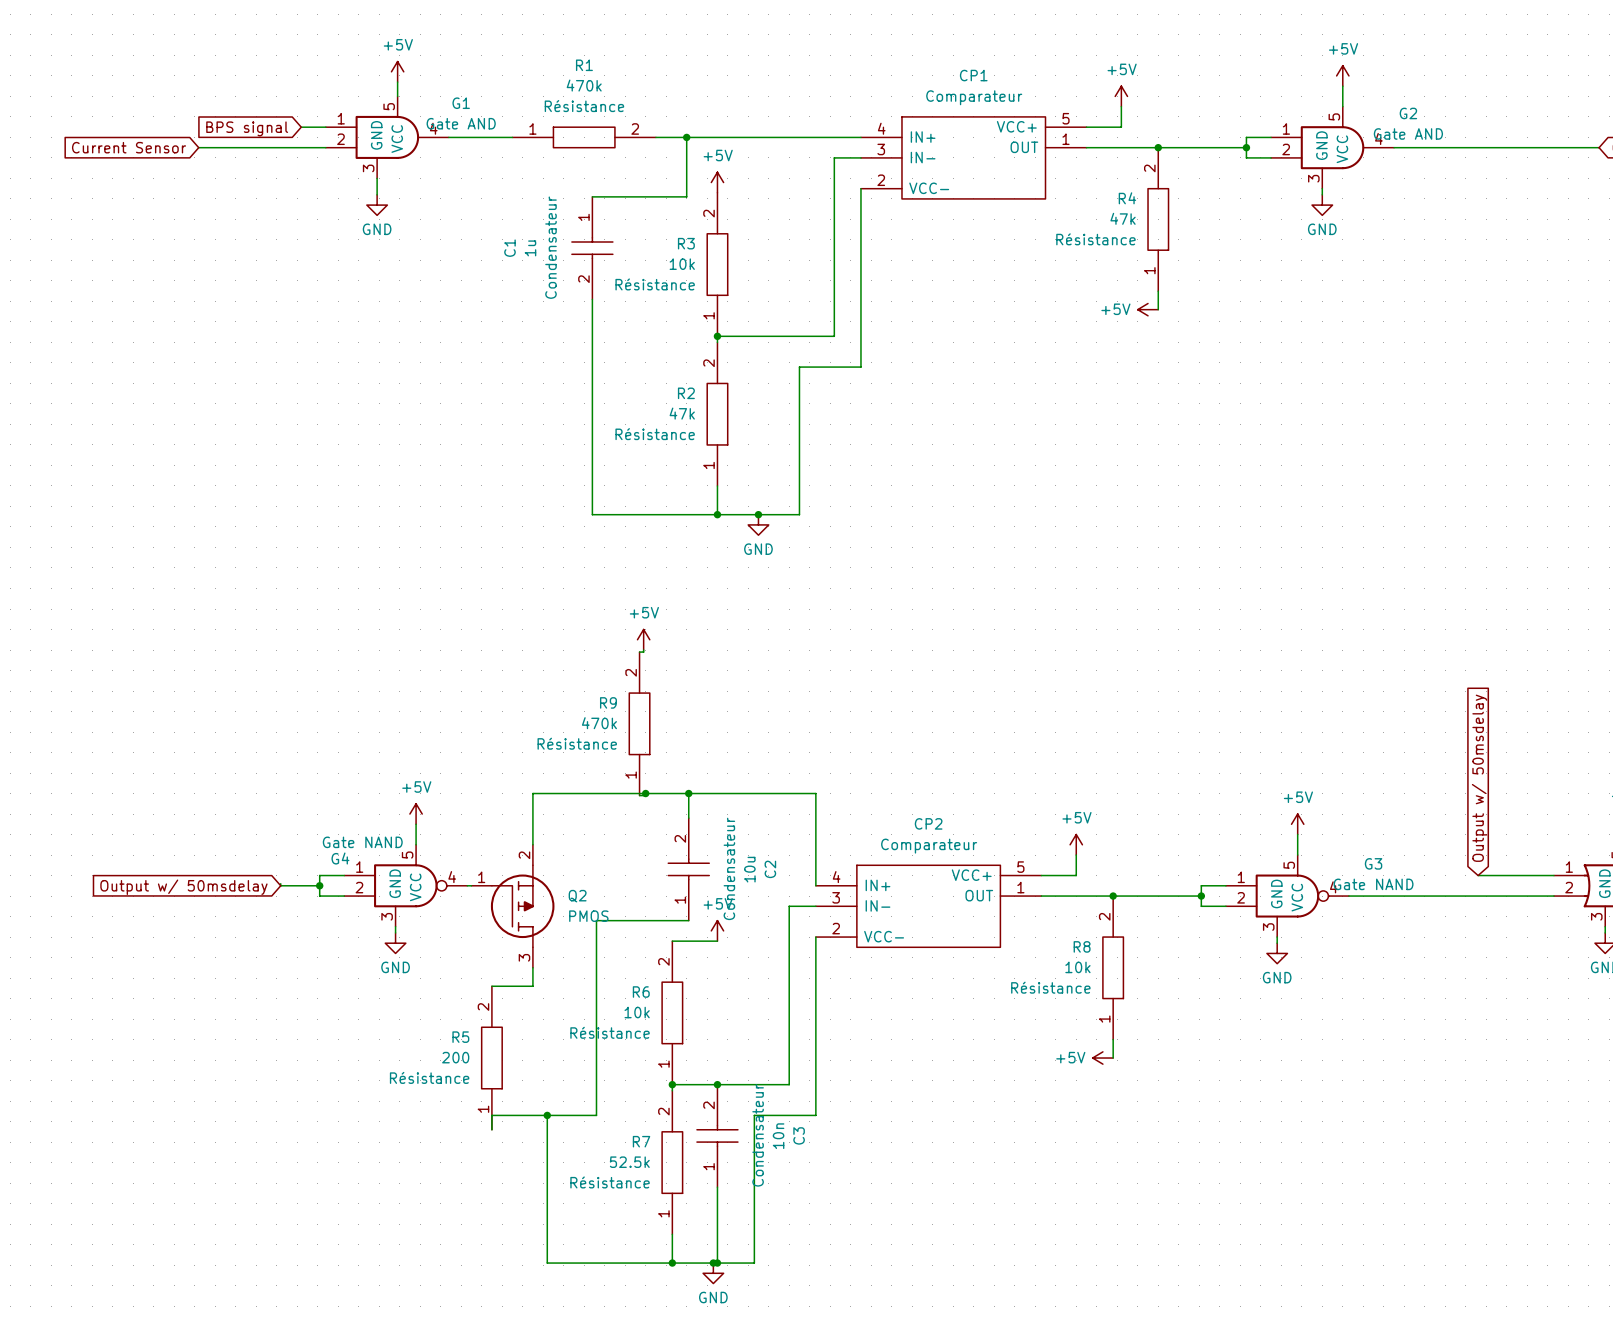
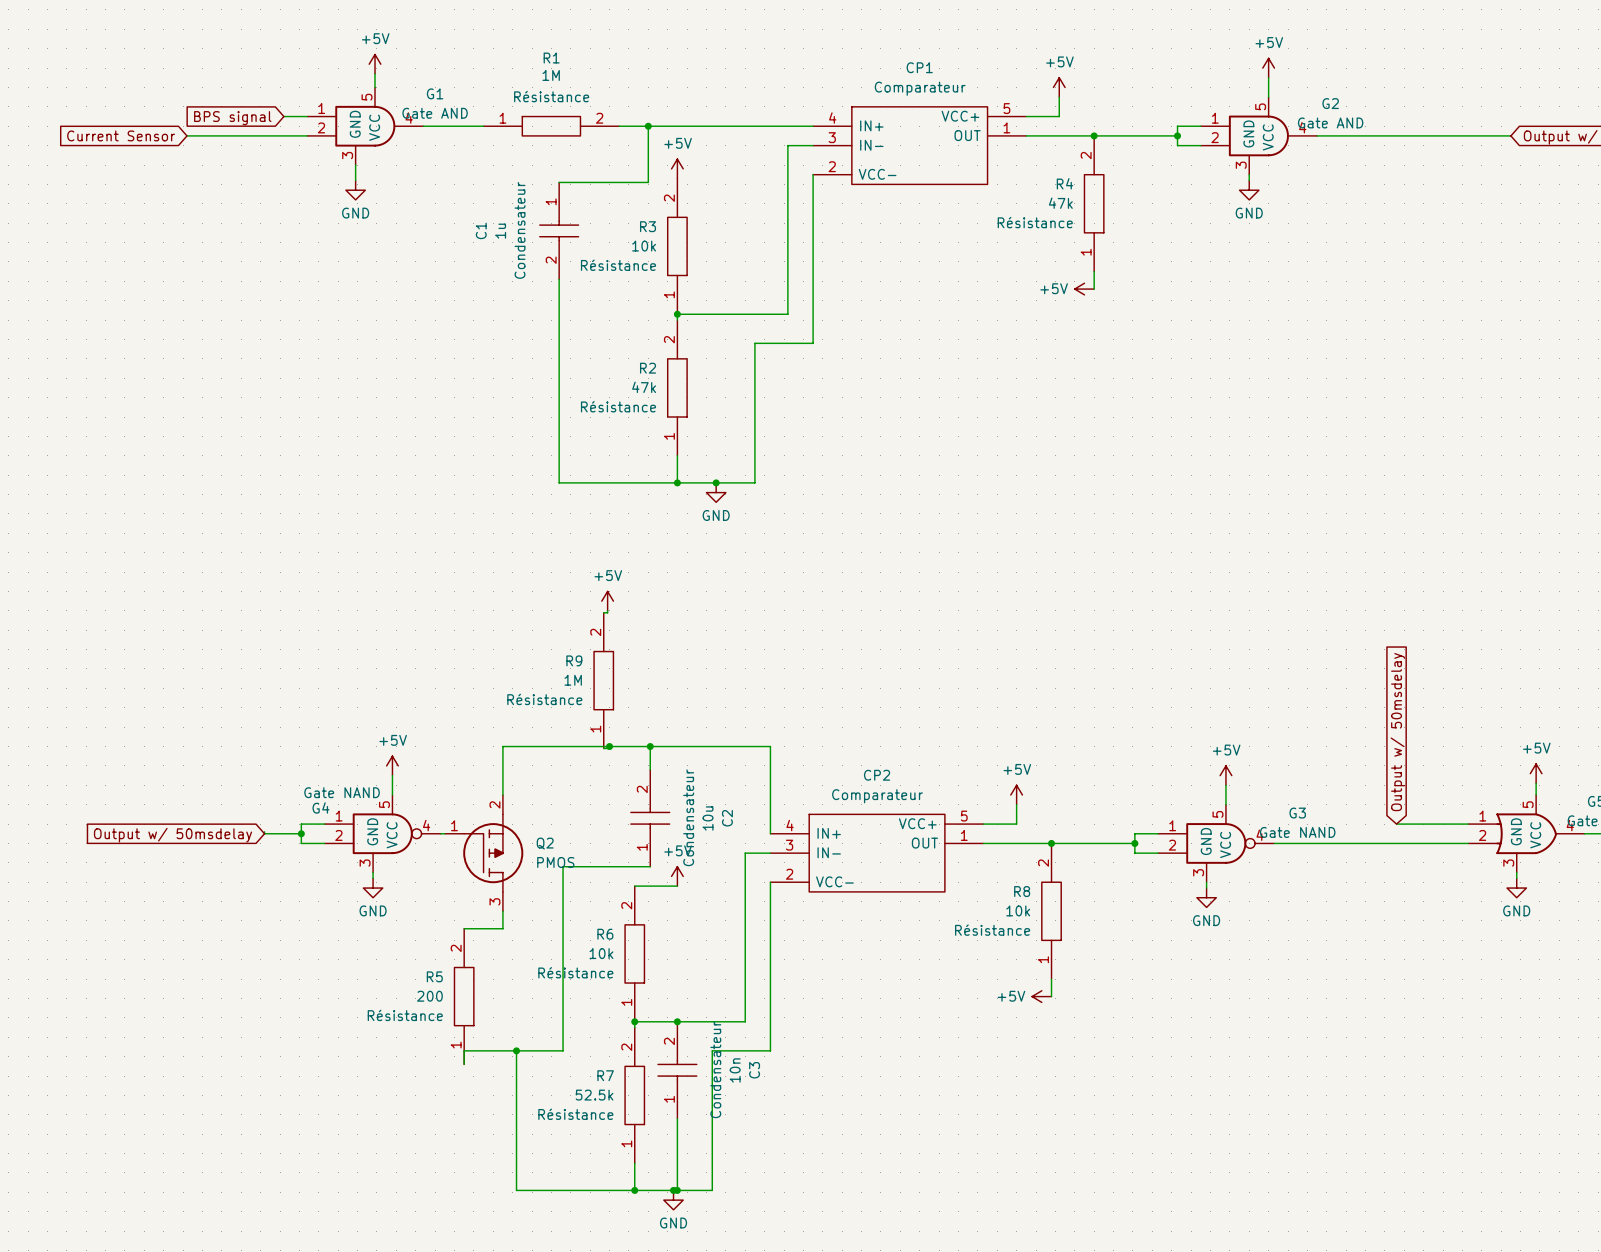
R1 value: 470k (584, 85) -> 1M (551, 75)
R9 value: 470k (599, 723) -> 1M (573, 680)

